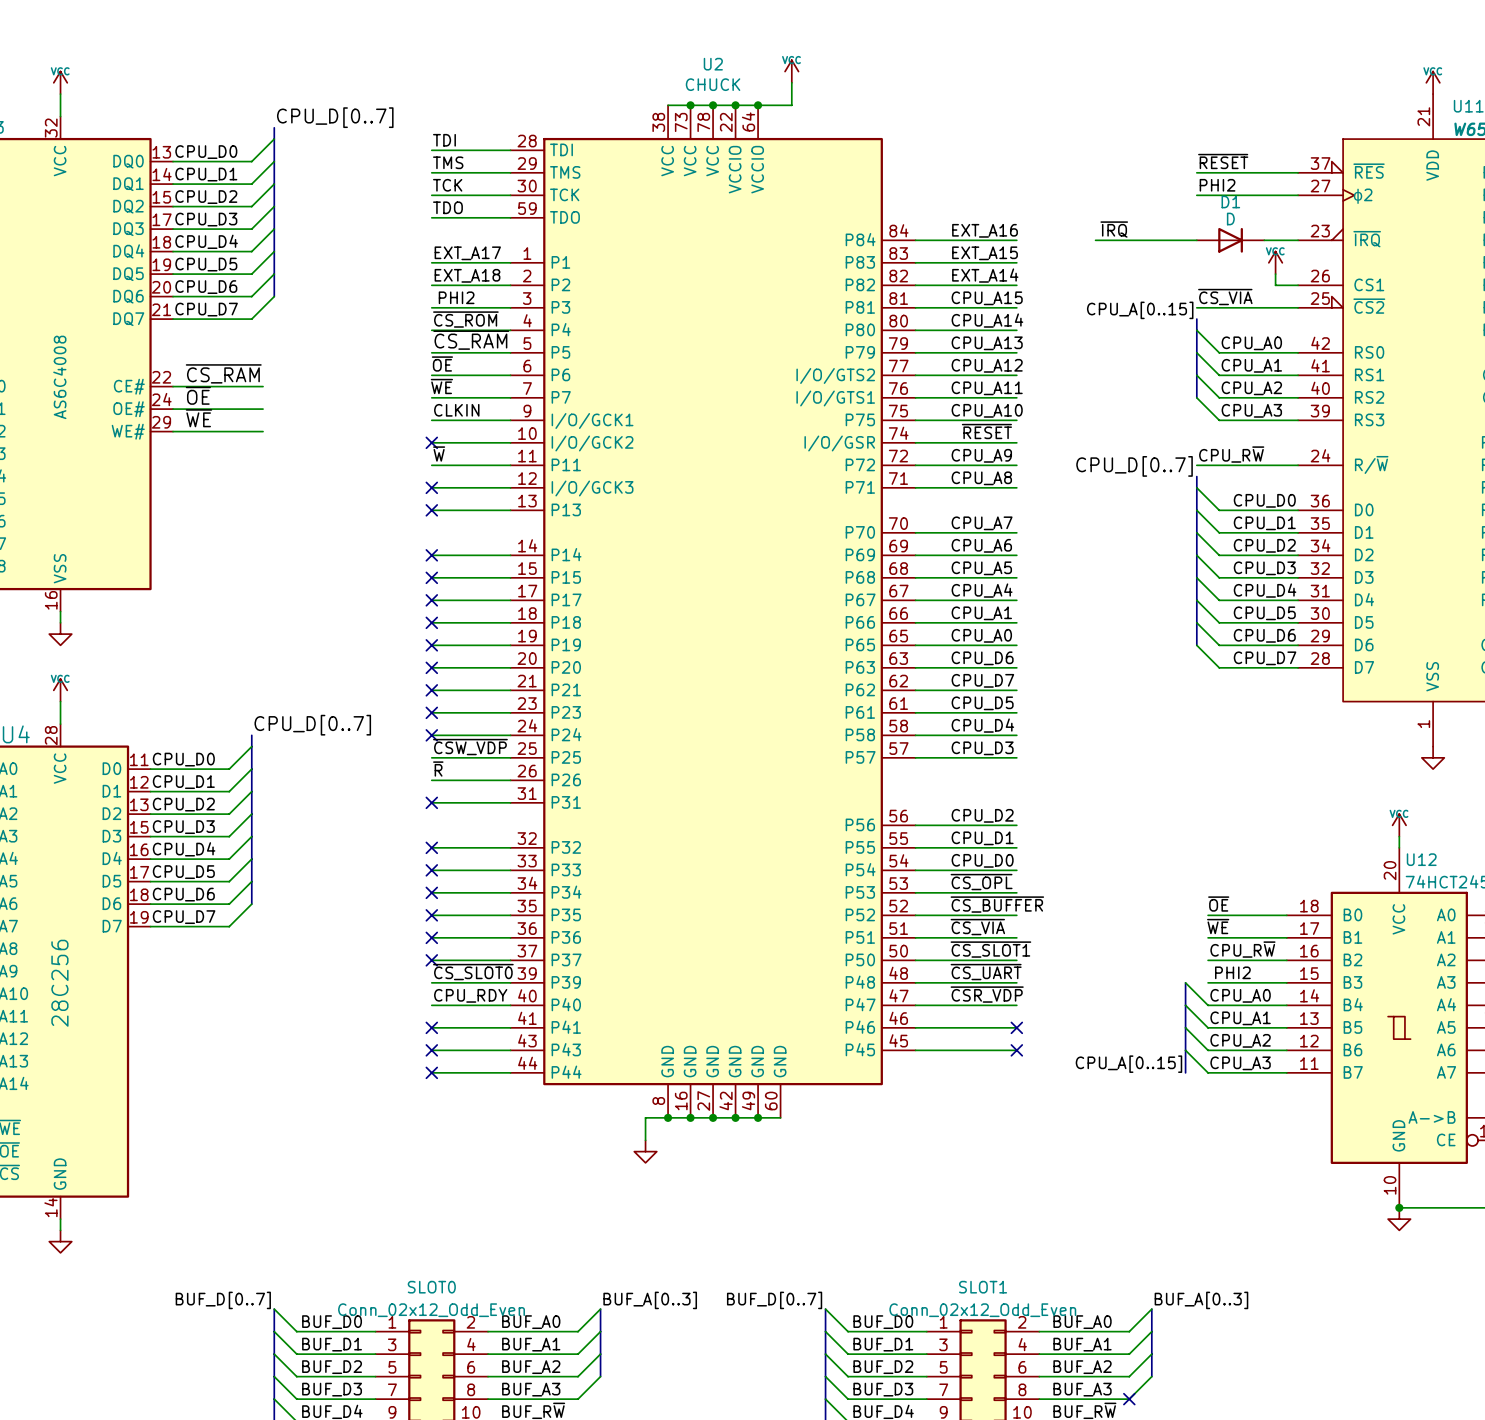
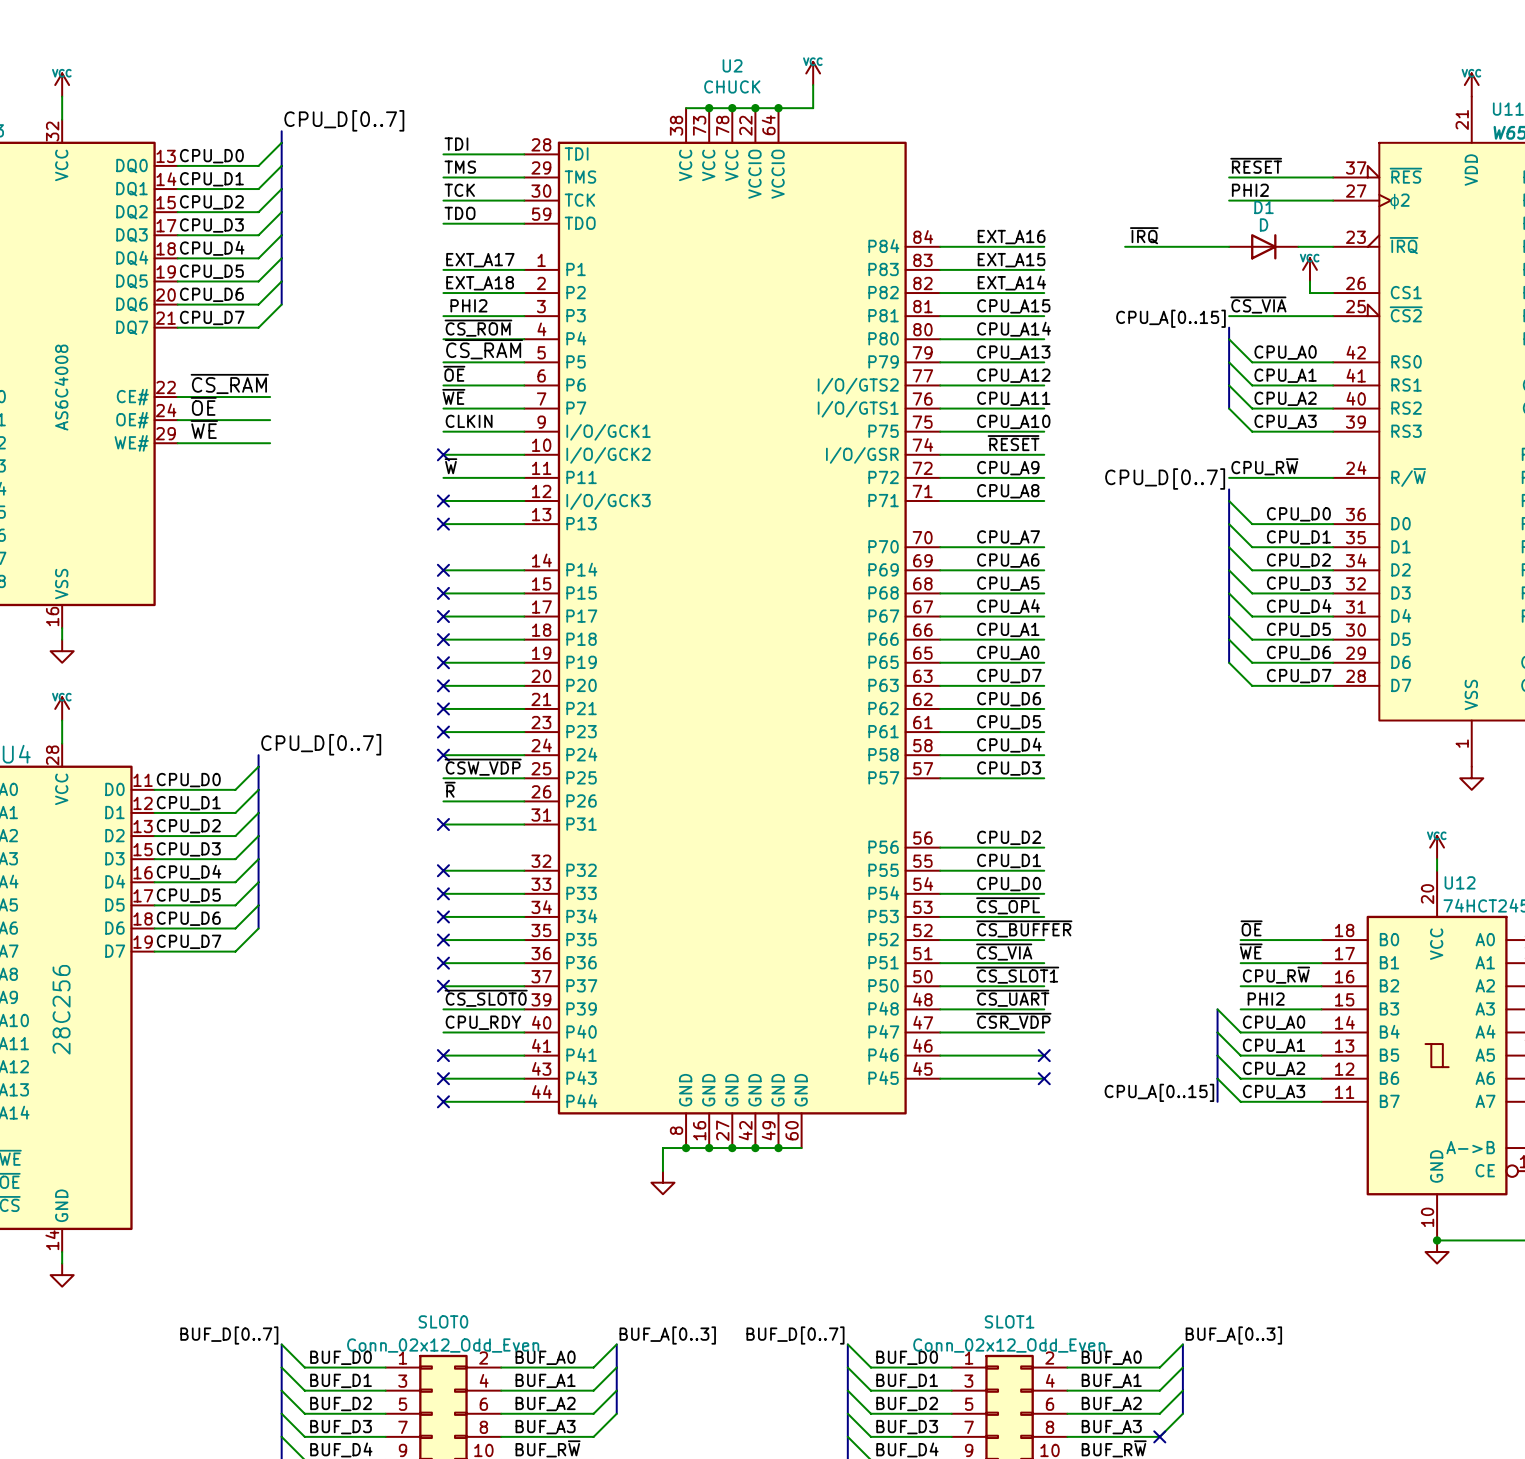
label: CPU_D6 (982, 658) -> CPU_D7 (1009, 676)
label: CPU_D7 (982, 680) -> CPU_D6 (1009, 699)

